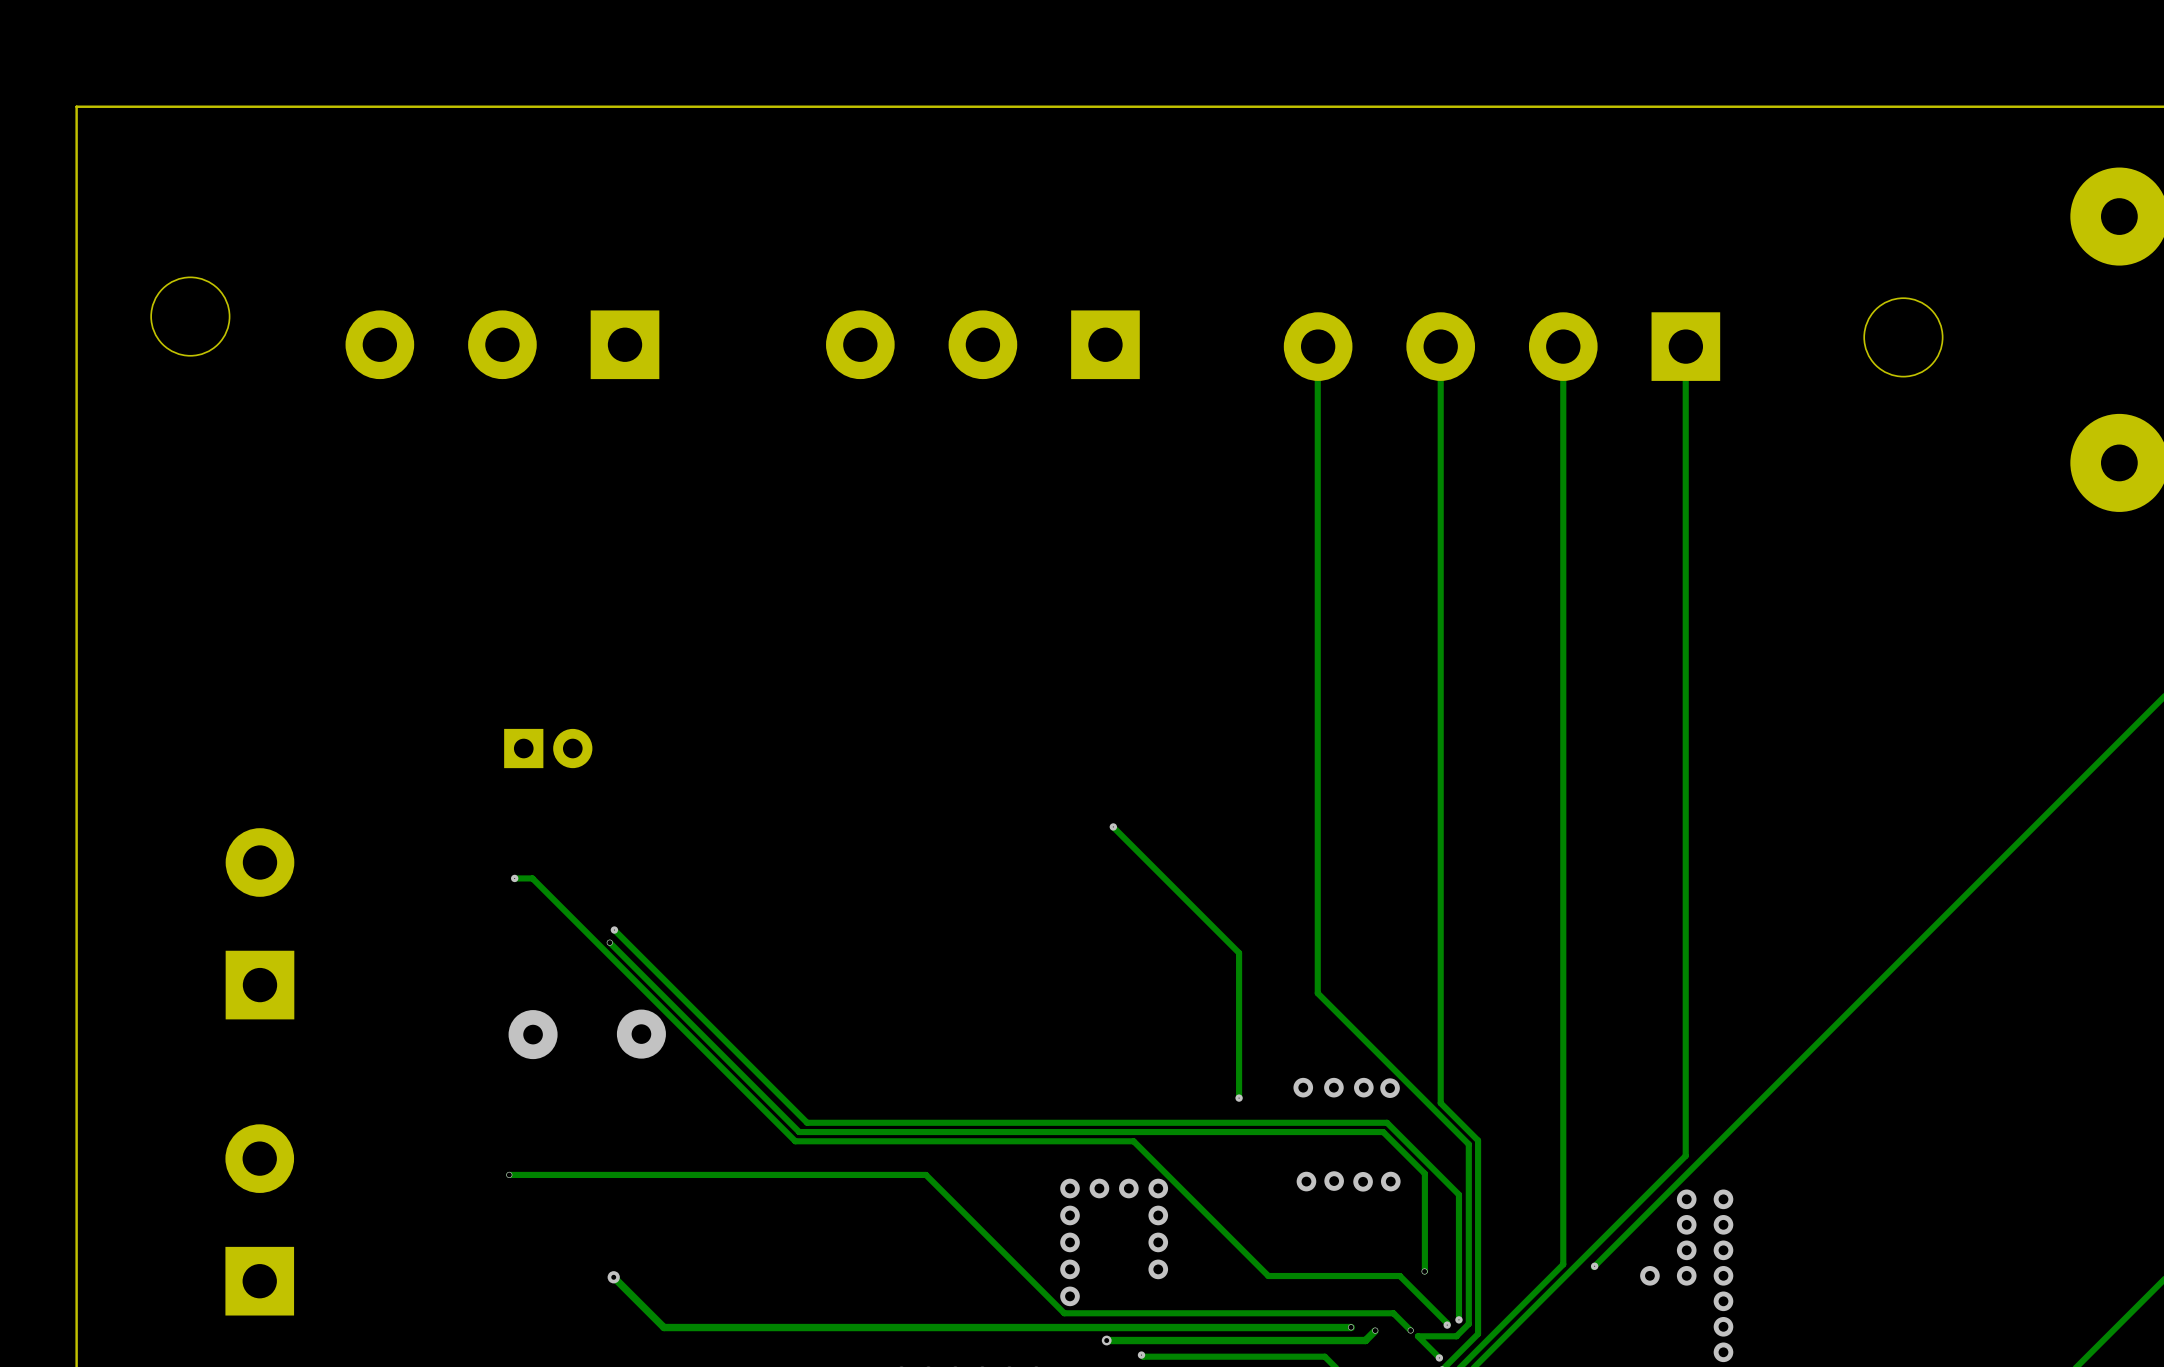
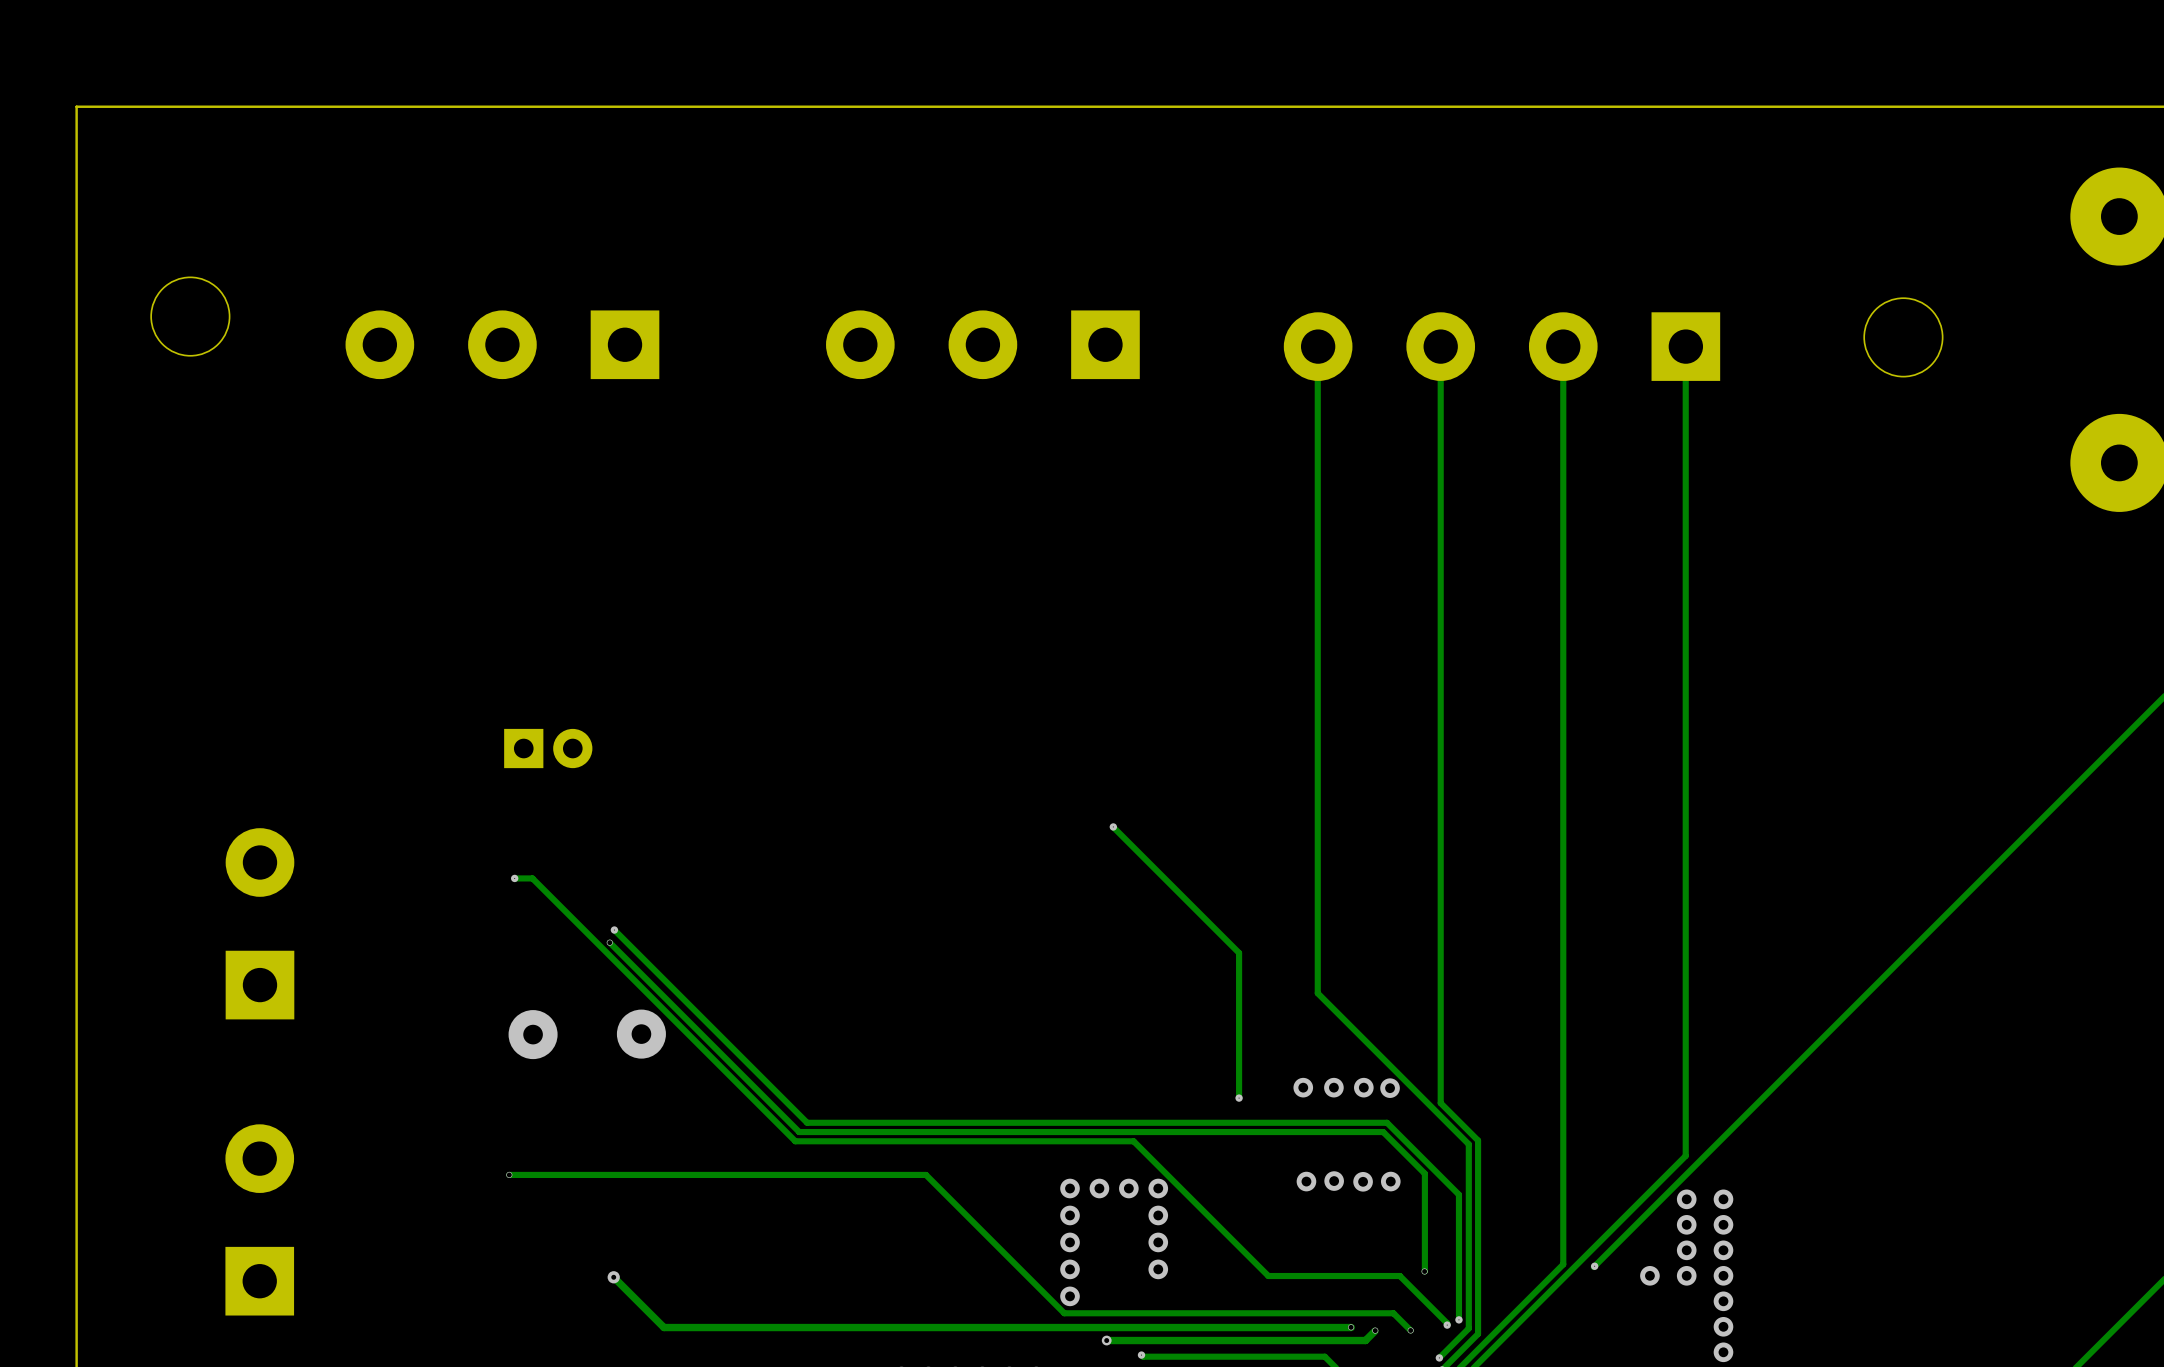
track: (1468, 1323) (1456, 1336) (1417, 1336) (1439, 1357) -> (1468, 1323) (1468, 1328) (1439, 1357)

